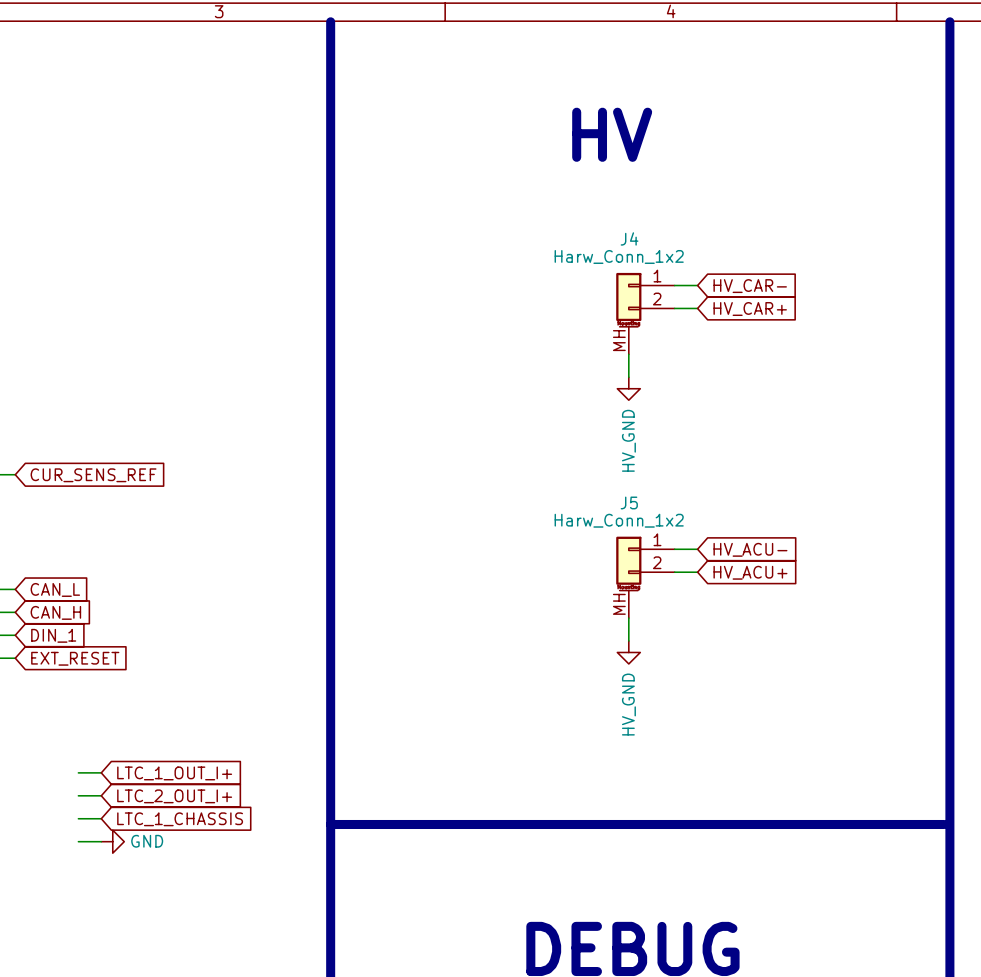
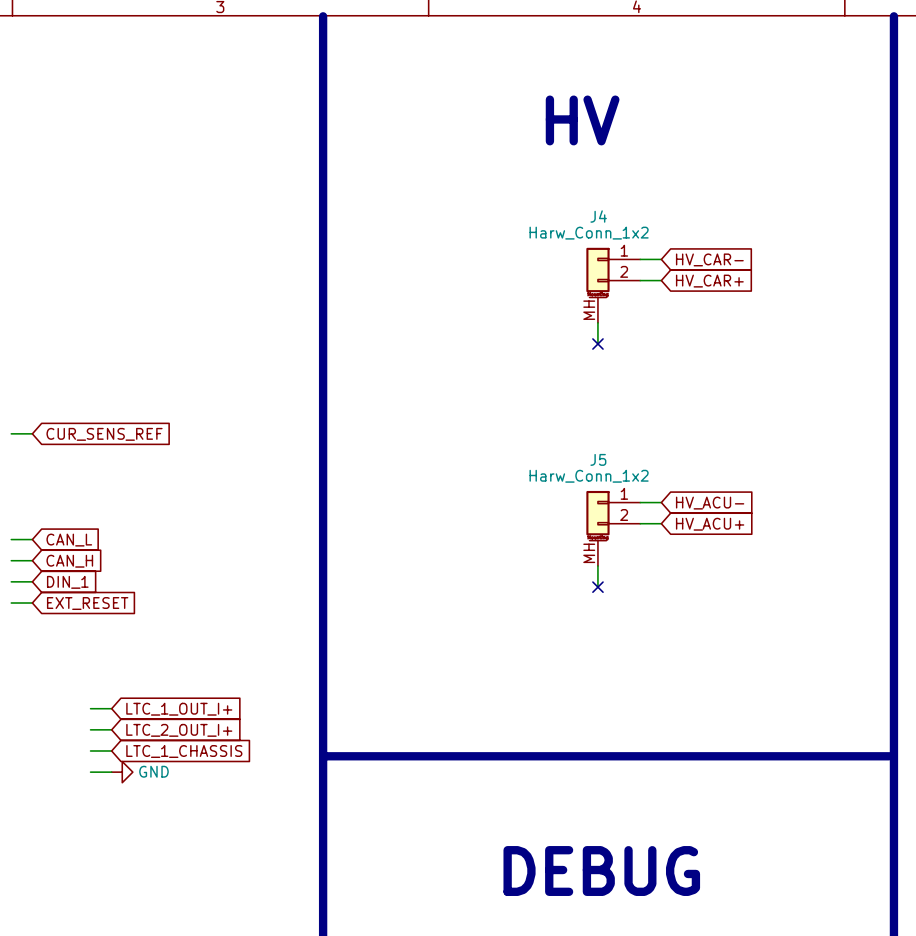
no-connect mark: none -> (597, 344)
power symbol: HV_GND (628, 388) -> none
no-connect mark: none -> (597, 587)
power symbol: HV_GND (628, 652) -> none

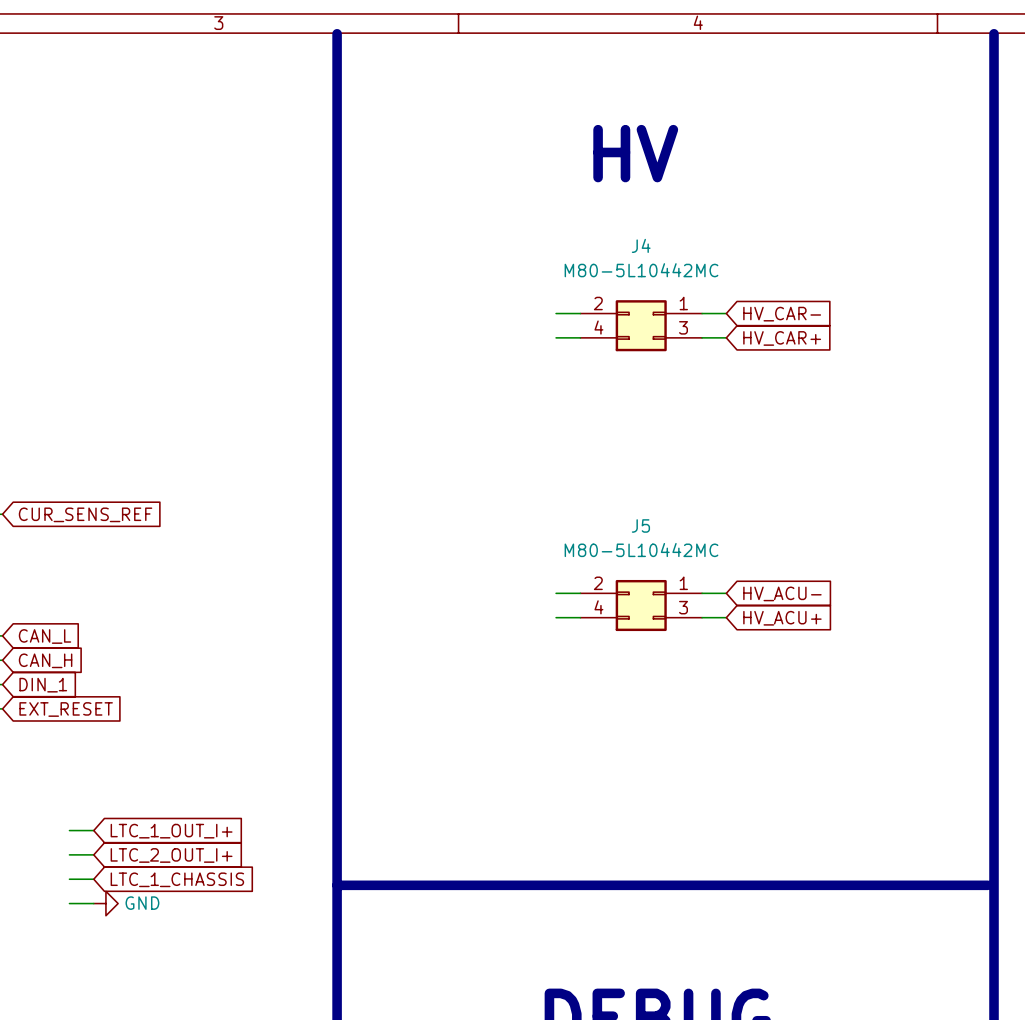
J4 name position: J4 (598, 216) -> J4 (641, 245)
J4 value: Harw_Conn_1x2 (589, 233) -> M80-5L10442MC (641, 270)
J4 symbol: [586, 247, 641, 323] -> [580, 300, 703, 352]
wire: none -> (556, 313) (580, 313)
wire: none -> (556, 337) (580, 337)
wire: (597, 322) (597, 344) -> none
no-connect mark: (597, 344) -> none
J5 name position: J5 (598, 459) -> J5 (640, 525)
J5 value: Harw_Conn_1x2 (589, 476) -> M80-5L10442MC (641, 550)
J5 symbol: [586, 490, 641, 567] -> [580, 579, 703, 632]
wire: none -> (556, 593) (580, 593)
wire: none -> (556, 617) (580, 617)
wire: (597, 566) (597, 587) -> none
no-connect mark: (597, 587) -> none

